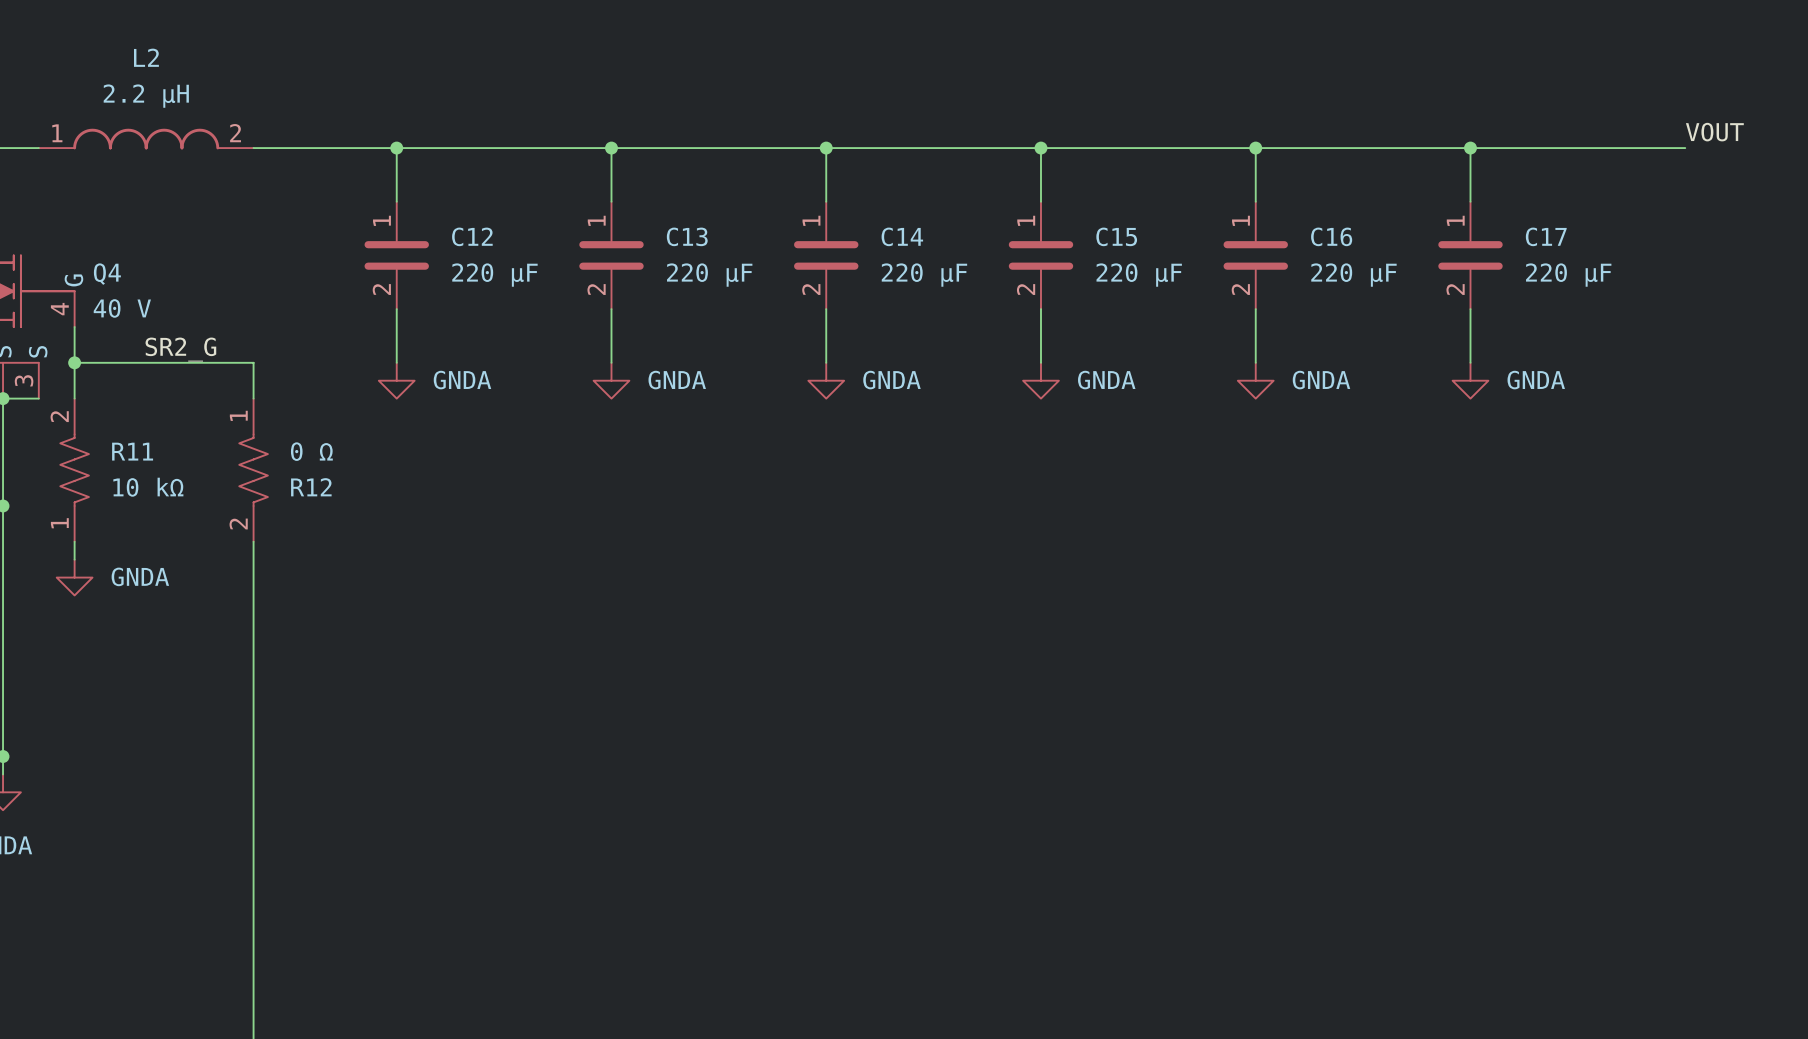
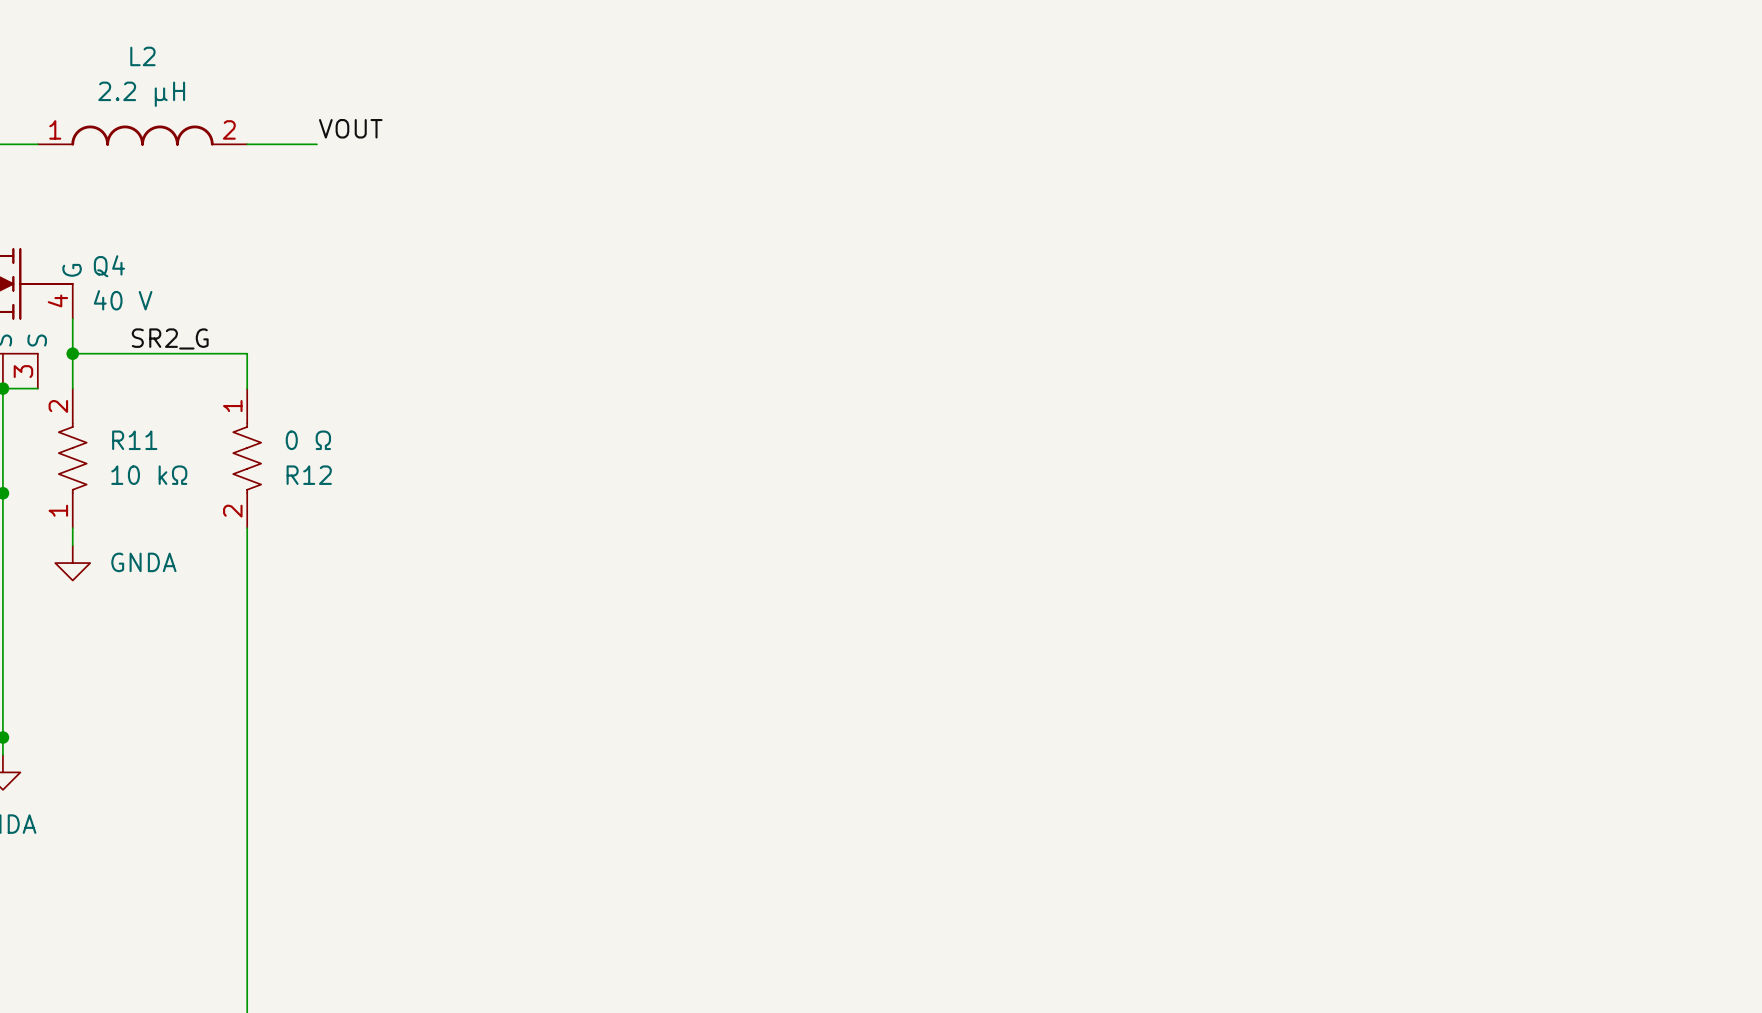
label: none -> VOUT (350, 128)
label: VOUT (1714, 132) -> none
wire: (325, 148) (1685, 148) -> none
wire: (396, 148) (396, 201) -> none
junction: (396, 148) -> none
wire: (611, 148) (611, 201) -> none
junction: (611, 148) -> none
wire: (826, 148) (826, 201) -> none
junction: (826, 148) -> none
wire: (1040, 148) (1040, 201) -> none
junction: (1040, 148) -> none
wire: (1255, 148) (1255, 201) -> none
junction: (1255, 148) -> none
wire: (1470, 148) (1470, 201) -> none
junction: (1470, 148) -> none
C12: 220 µF (396, 255) -> none
C13: 220 µF (611, 255) -> none
C14: 220 µF (826, 255) -> none
C15: 220 µF (1040, 255) -> none
C16: 220 µF (1255, 255) -> none
C17: 220 µF (1470, 255) -> none
wire: (396, 309) (396, 362) -> none
wire: (611, 309) (611, 362) -> none
wire: (826, 309) (826, 362) -> none
wire: (1040, 309) (1040, 362) -> none
wire: (1255, 309) (1255, 362) -> none
wire: (1470, 309) (1470, 362) -> none
power symbol: GNDA (396, 380) -> none
power symbol: GNDA (611, 380) -> none
power symbol: GNDA (826, 380) -> none
power symbol: GNDA (1040, 380) -> none
power symbol: GNDA (1255, 380) -> none
power symbol: GNDA (1470, 380) -> none

